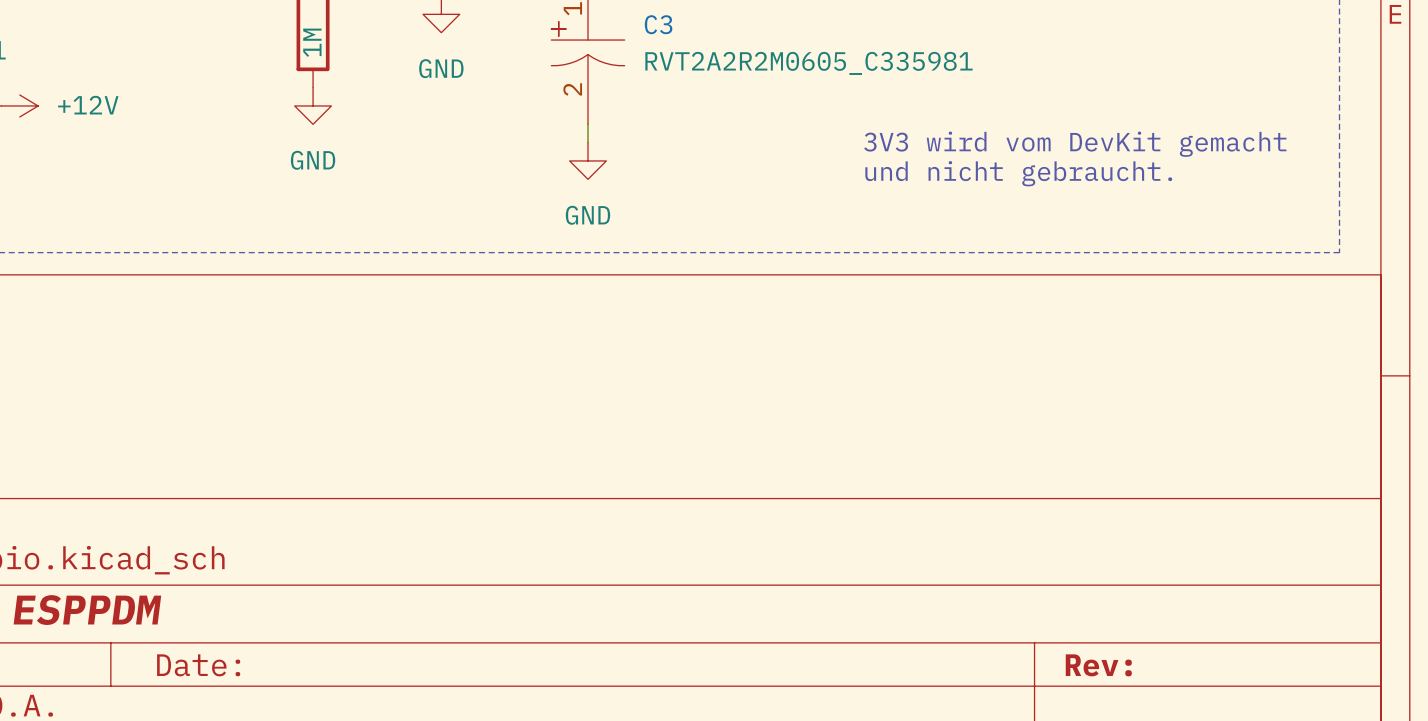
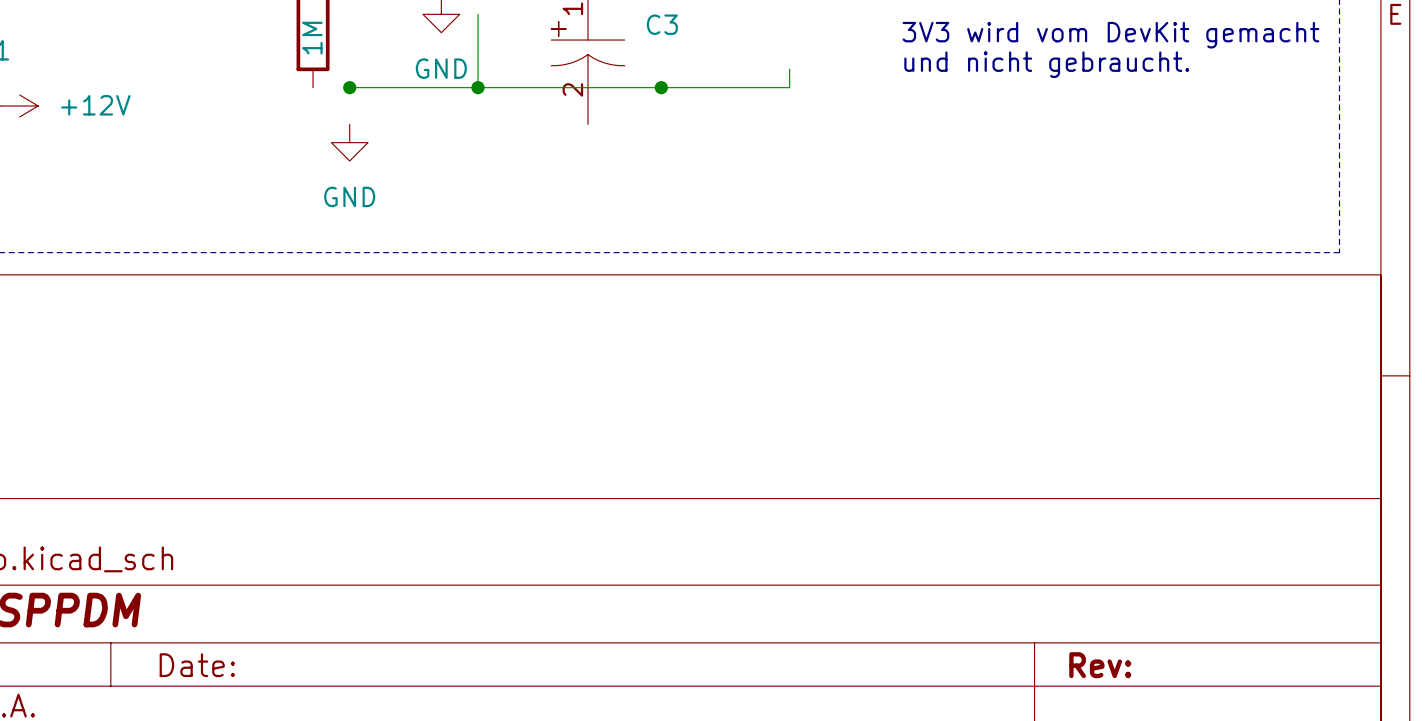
wire: none -> (478, 14) (478, 87)
C3 value: RVT2A2R2M0605_C335981 (808, 63) -> none
wire: none -> (789, 69) (789, 87) (349, 87)
junction: none -> (349, 87)
junction: none -> (478, 87)
junction: none -> (661, 87)
power symbol position: GND (313, 105) -> GND (349, 142)
wire: (587, 124) (587, 142) -> none
text position: 3V3 wird vom DevKit gemacht (1075, 144) -> 3V3 wird vom DevKit gemacht (1110, 35)
power symbol: GND (587, 160) -> none
text position: und nicht gebraucht. (1018, 173) -> und nicht gebraucht. (1046, 64)

